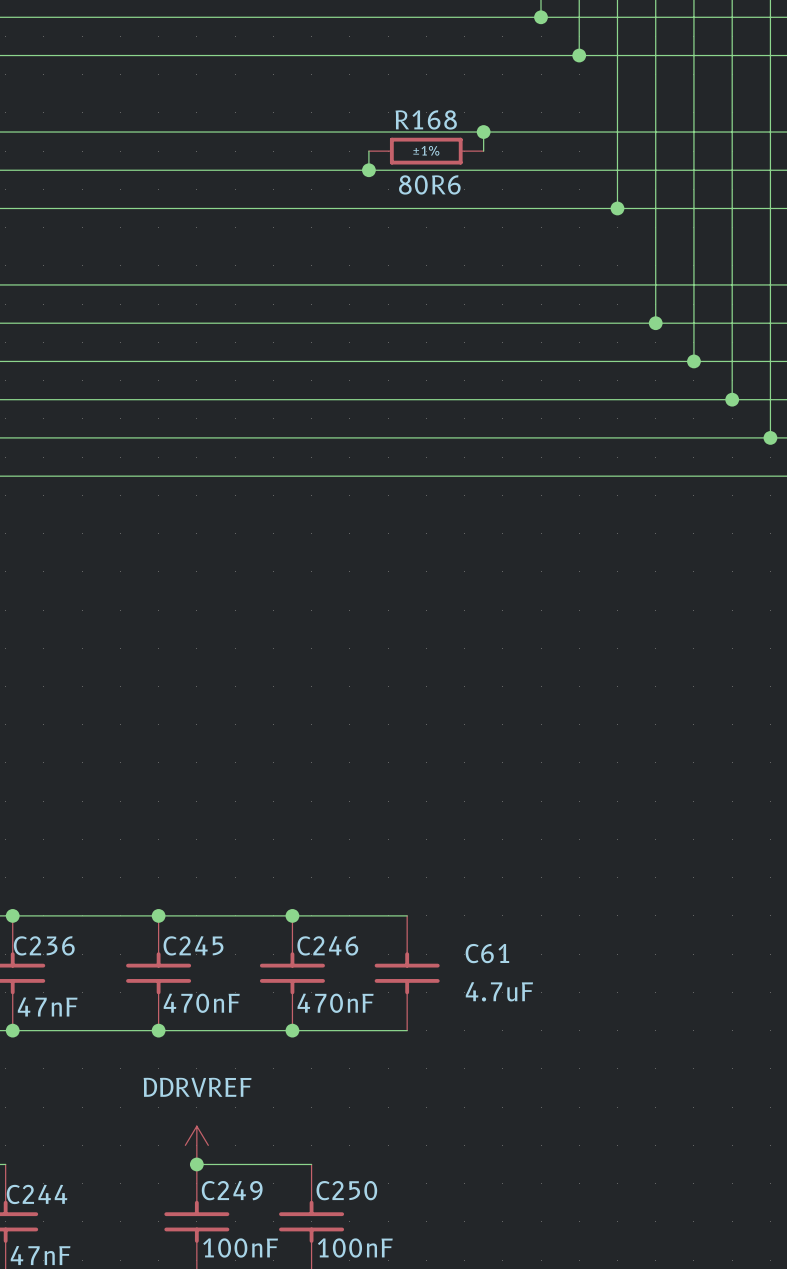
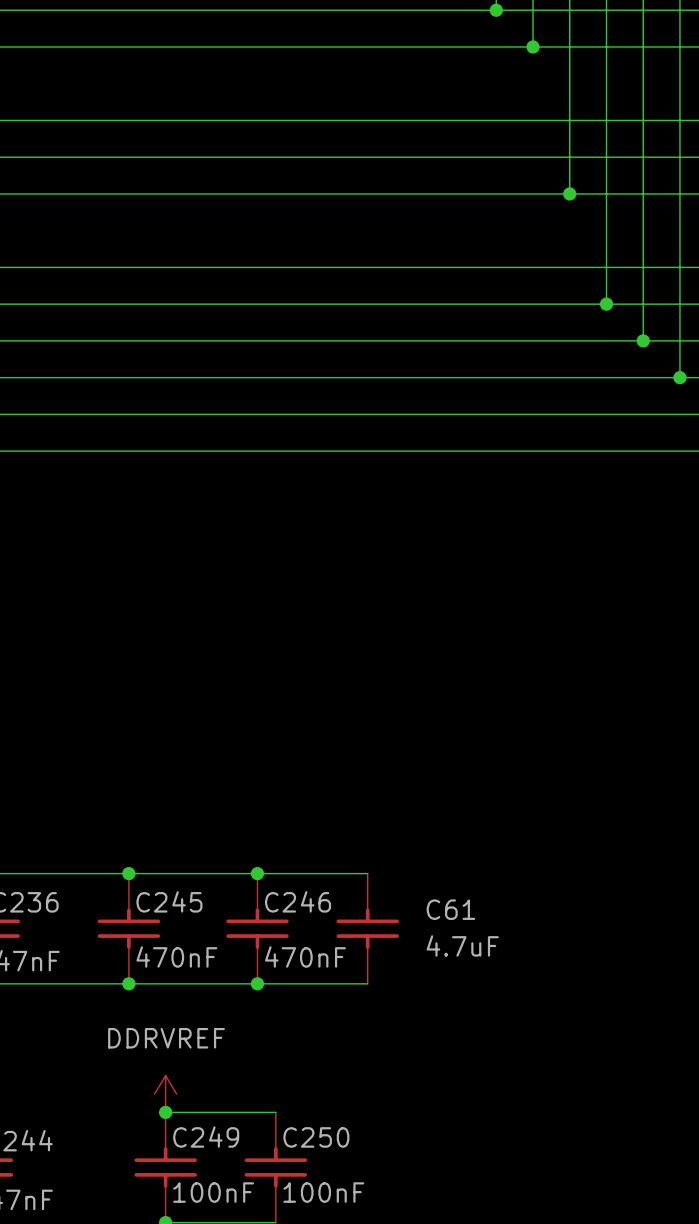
wire: (483, 132) (483, 151) -> none
junction: (483, 132) -> none
wire: (368, 151) (368, 170) -> none
R168: (426, 151) -> none
junction: (368, 170) -> none

